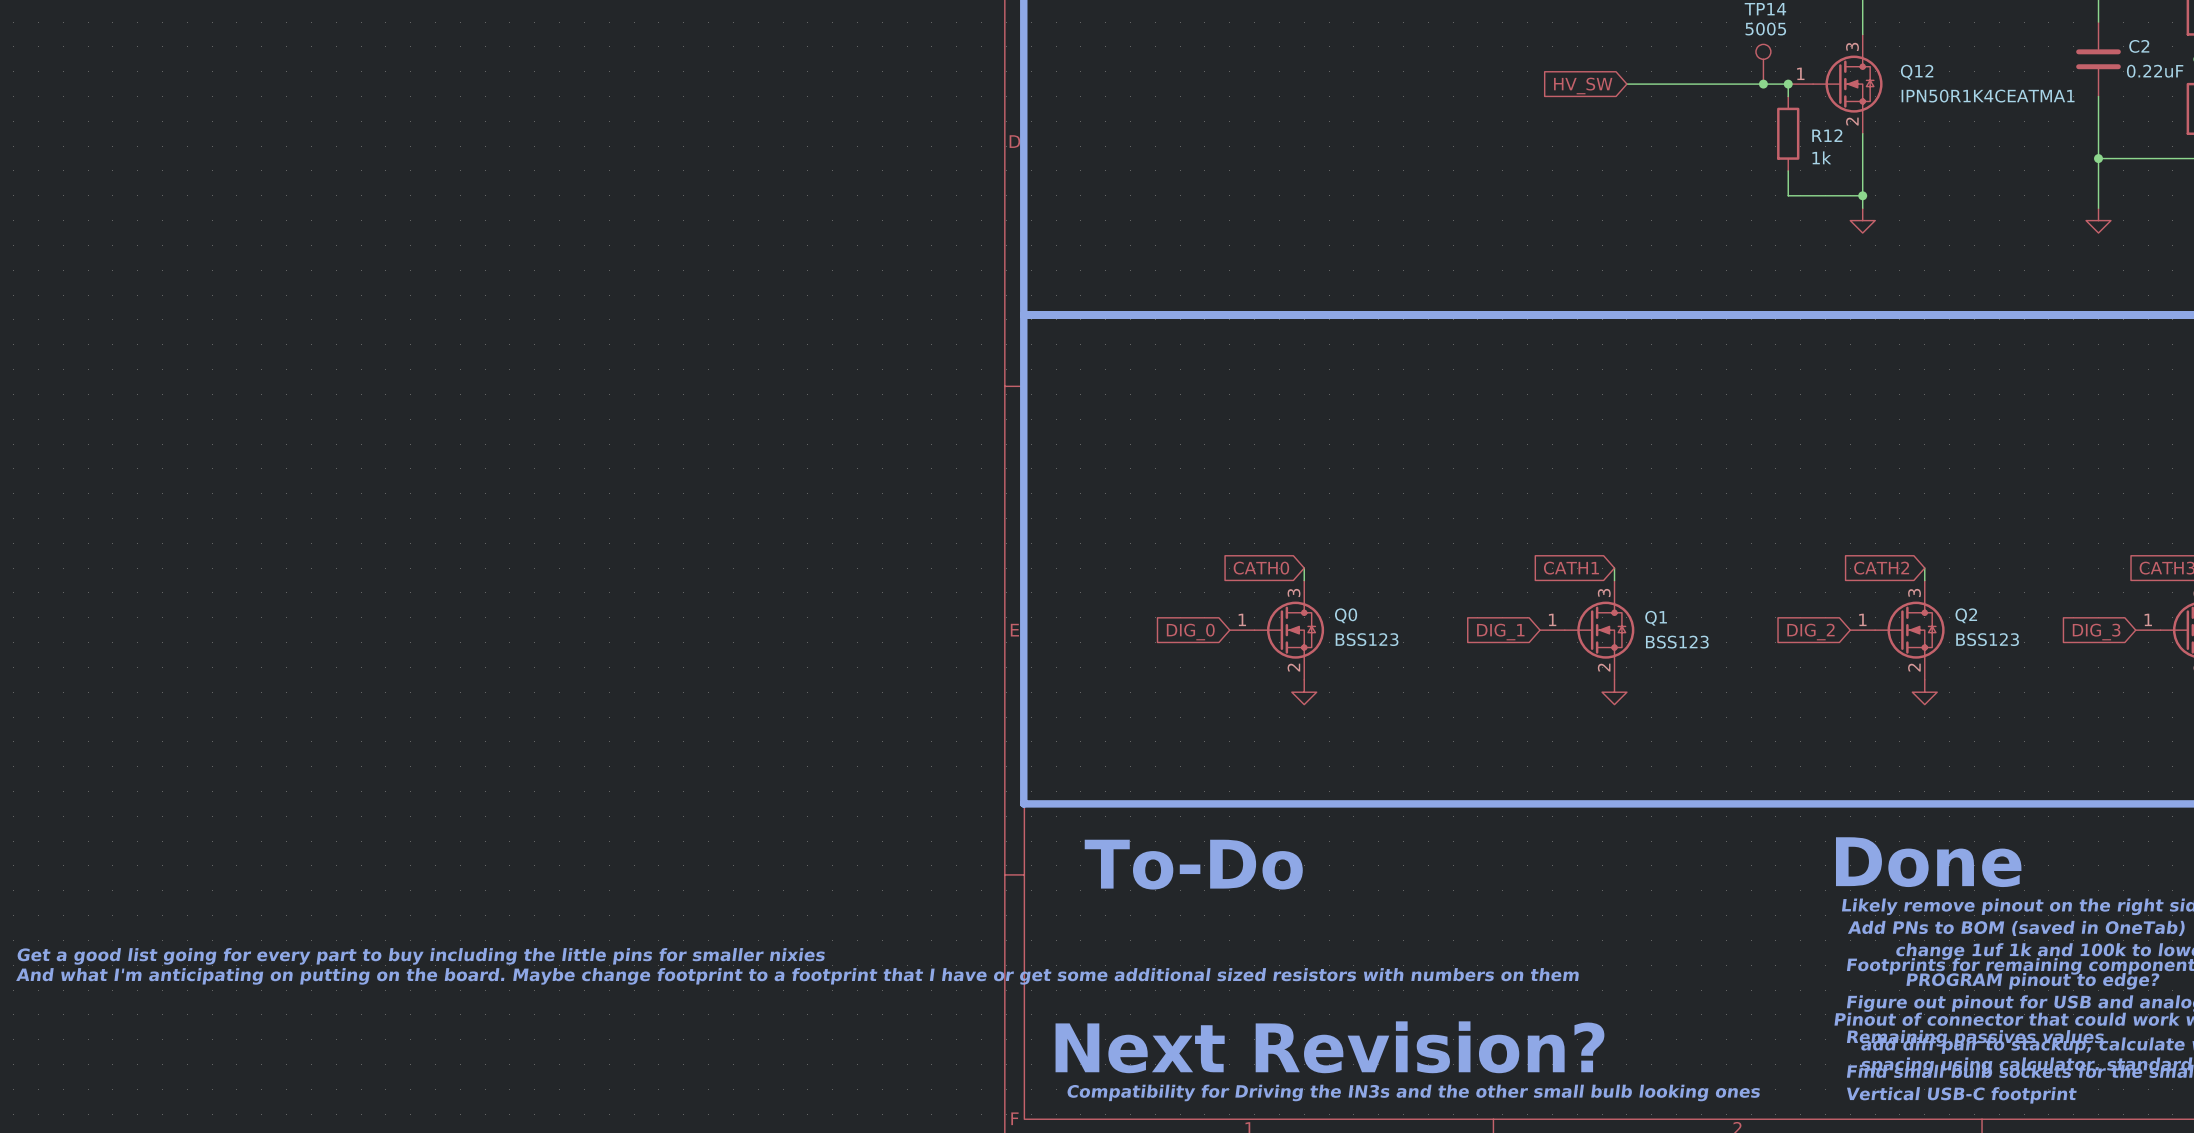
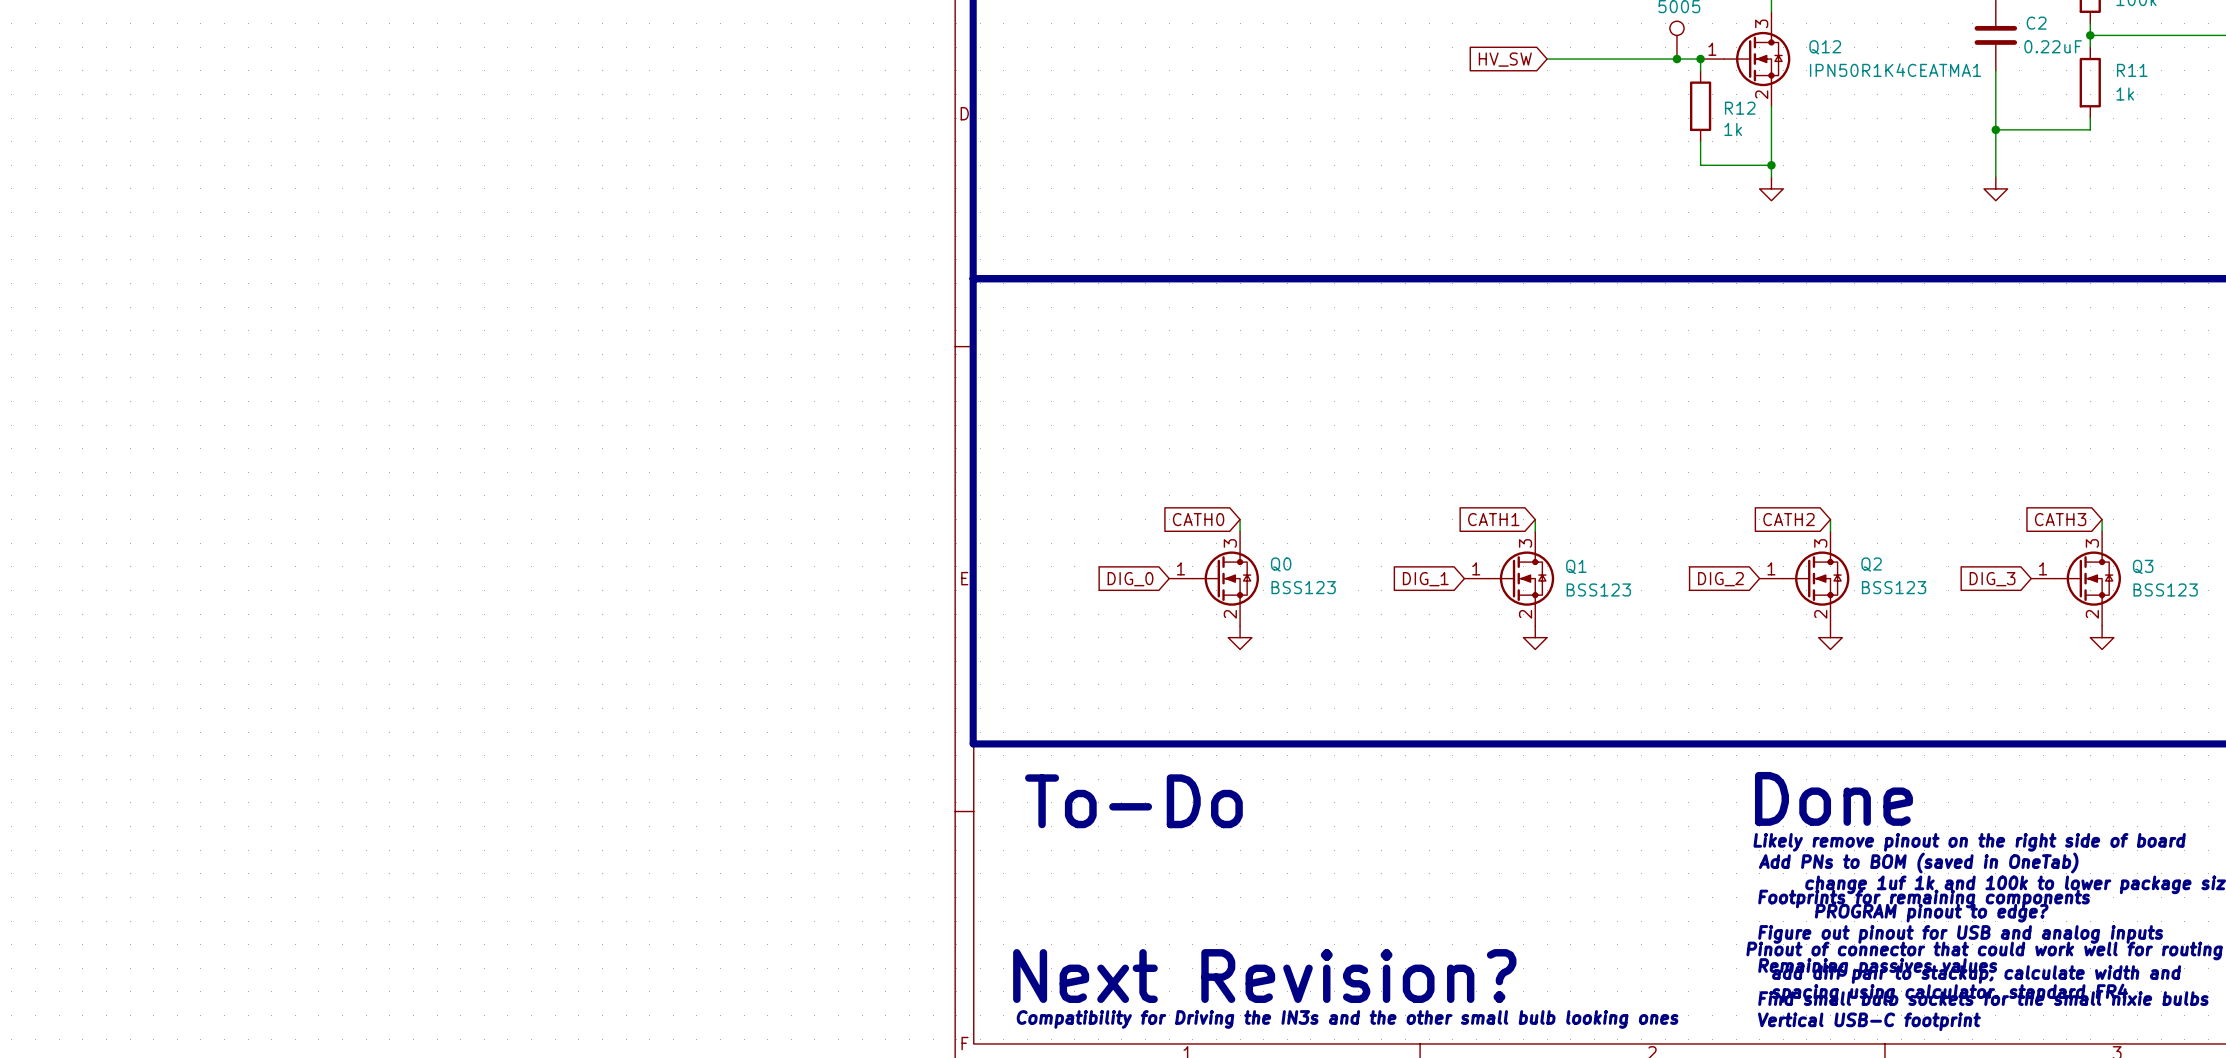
text: Get a good list going for every part to buy including the little pins for smaller nixies (420, 956) -> none
text: And what I'm anticipating on putting on the board. Maybe change footprint to a footprint that I have or get some additional sized resistors with numbers on them (797, 976) -> none

